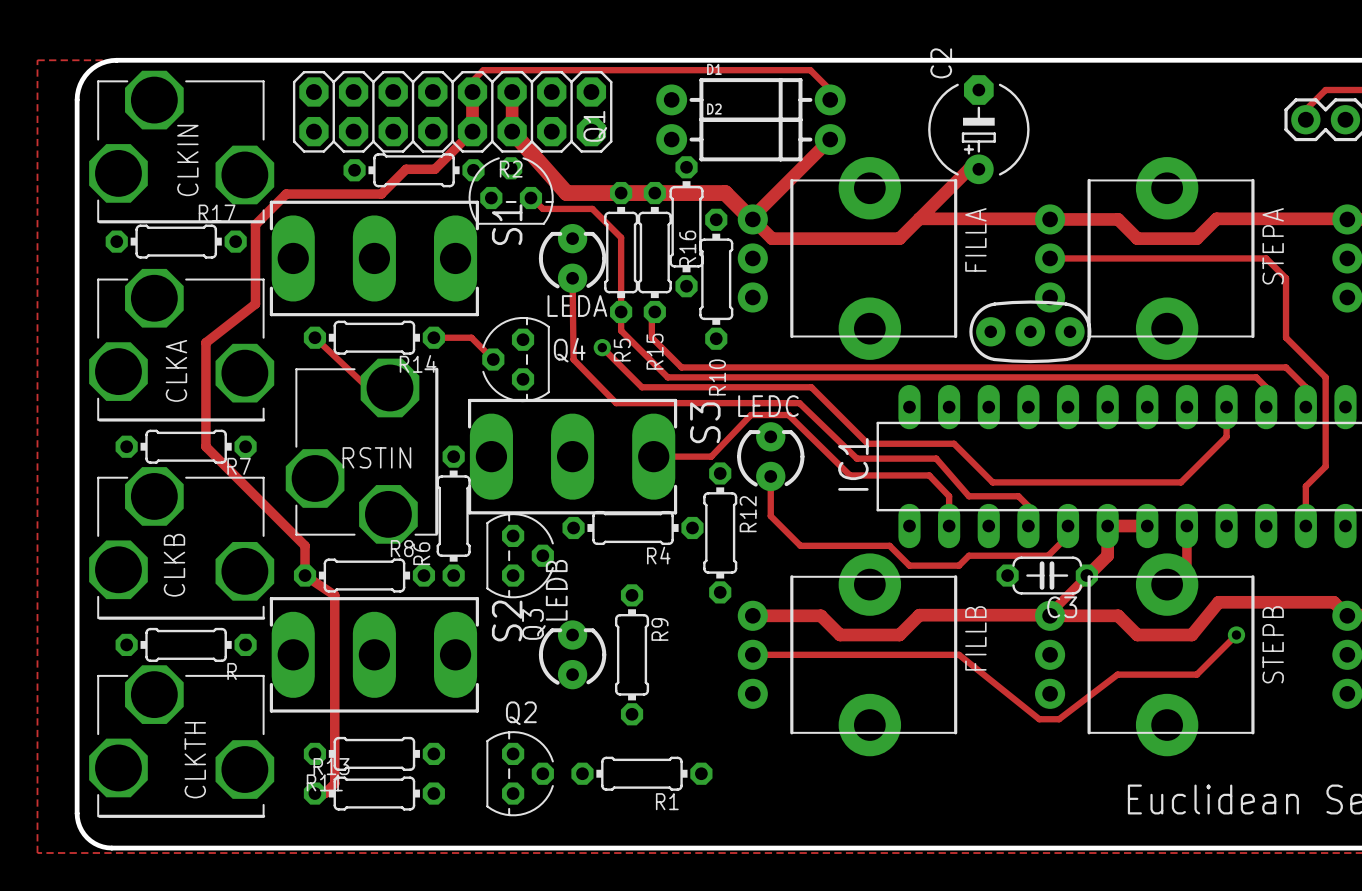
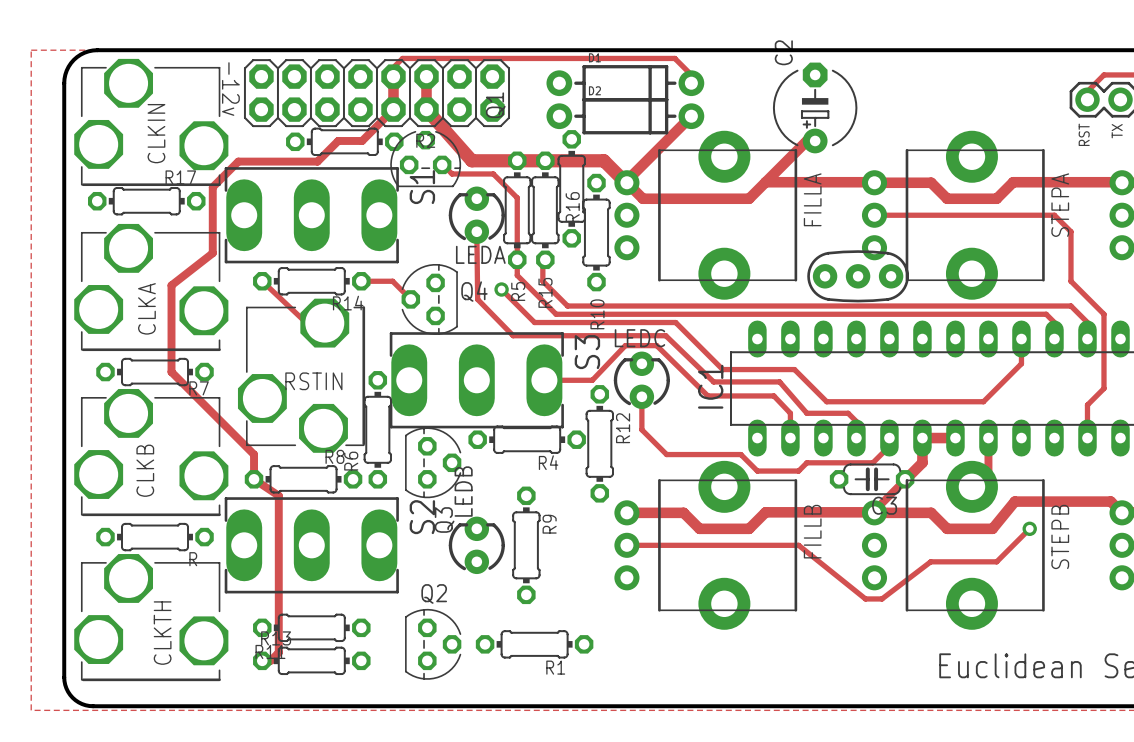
text: none -> -12v (230, 89)
text: none -> TX (1117, 131)
text: none -> RST (1084, 134)

